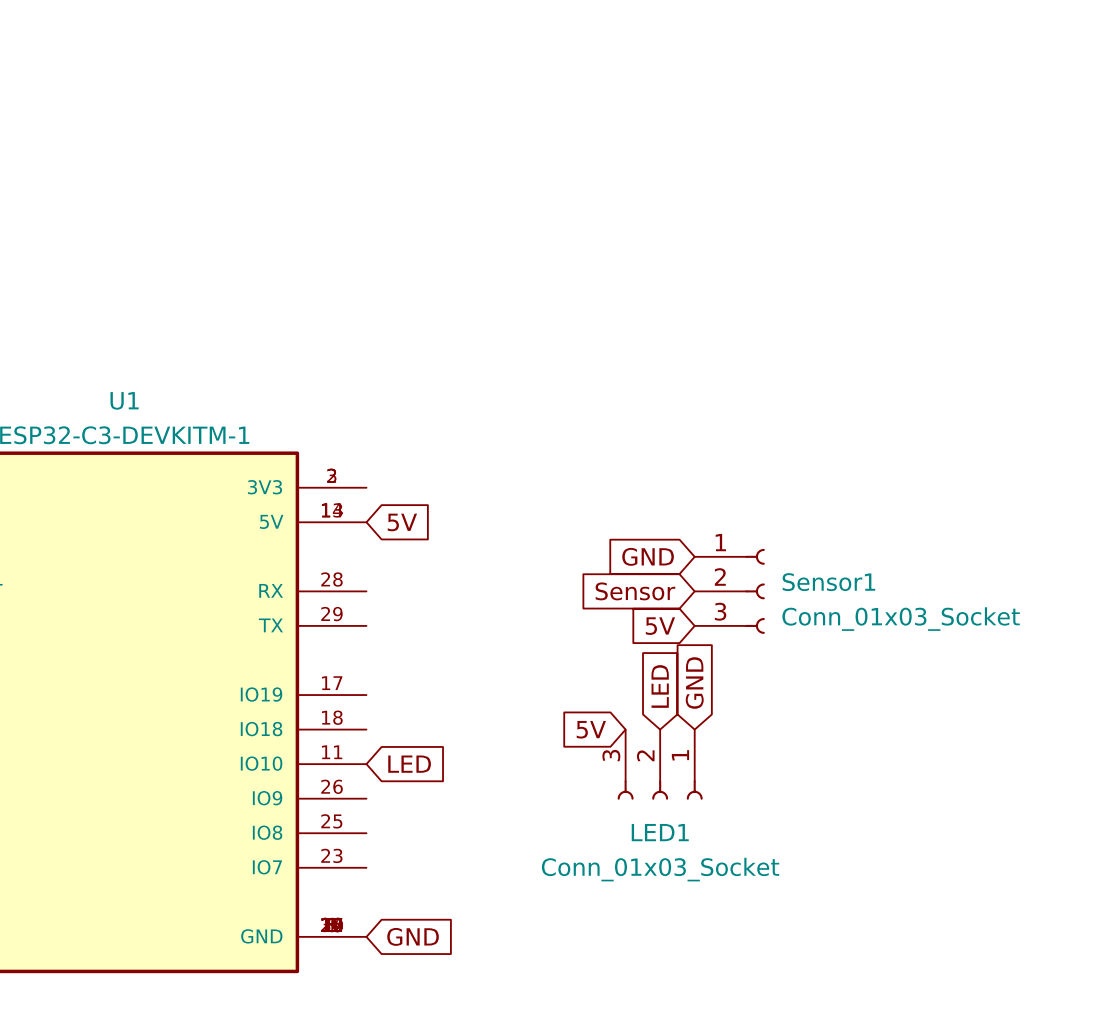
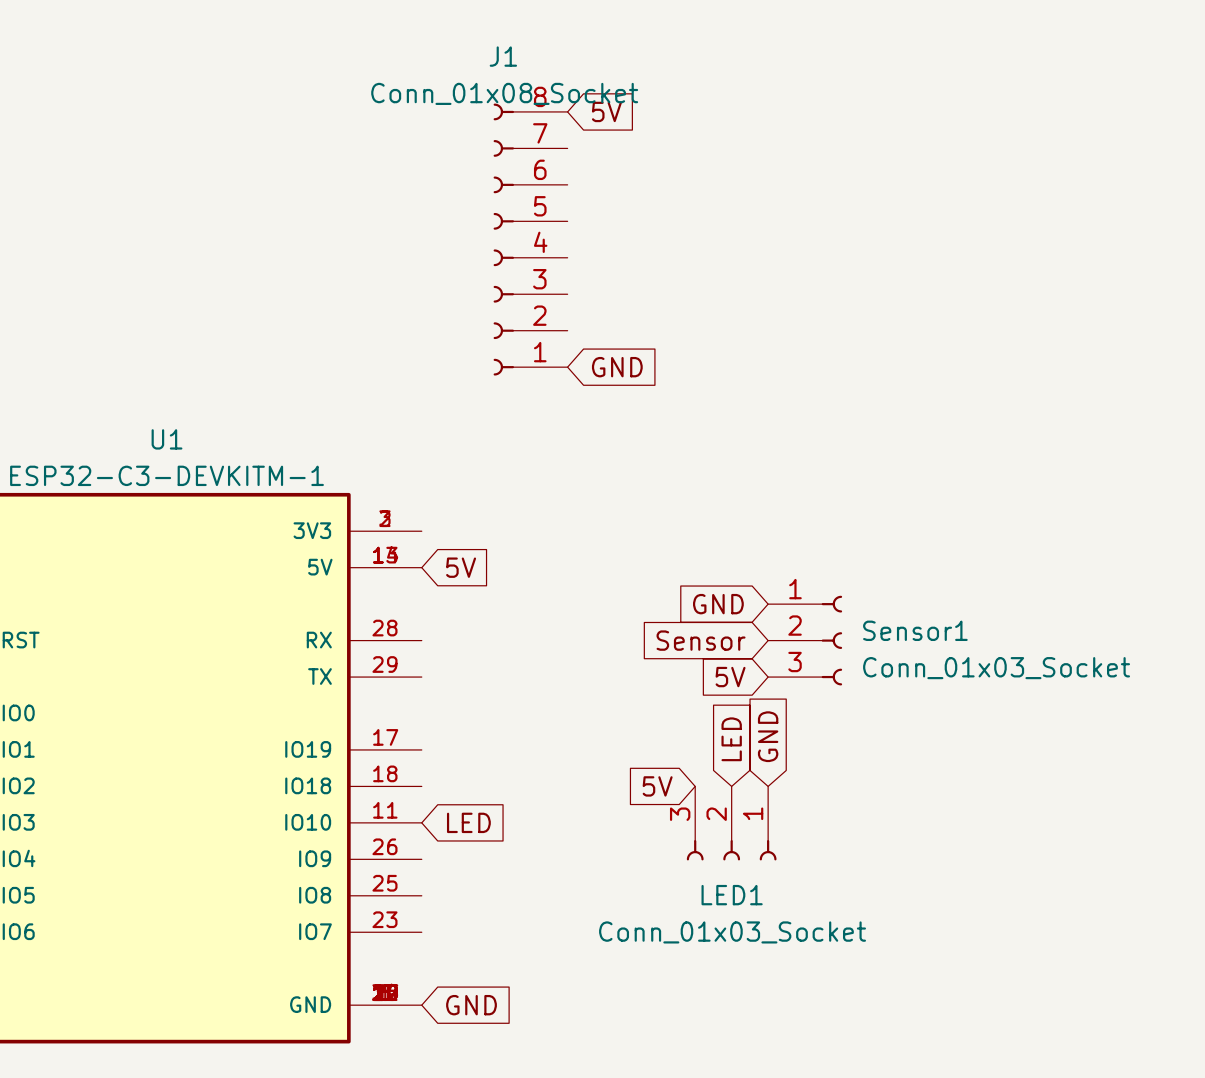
global label: none -> 5V (606, 111)
J1: none -> Conn_01x08_Socket (530, 239)
global label: none -> GND (617, 367)

